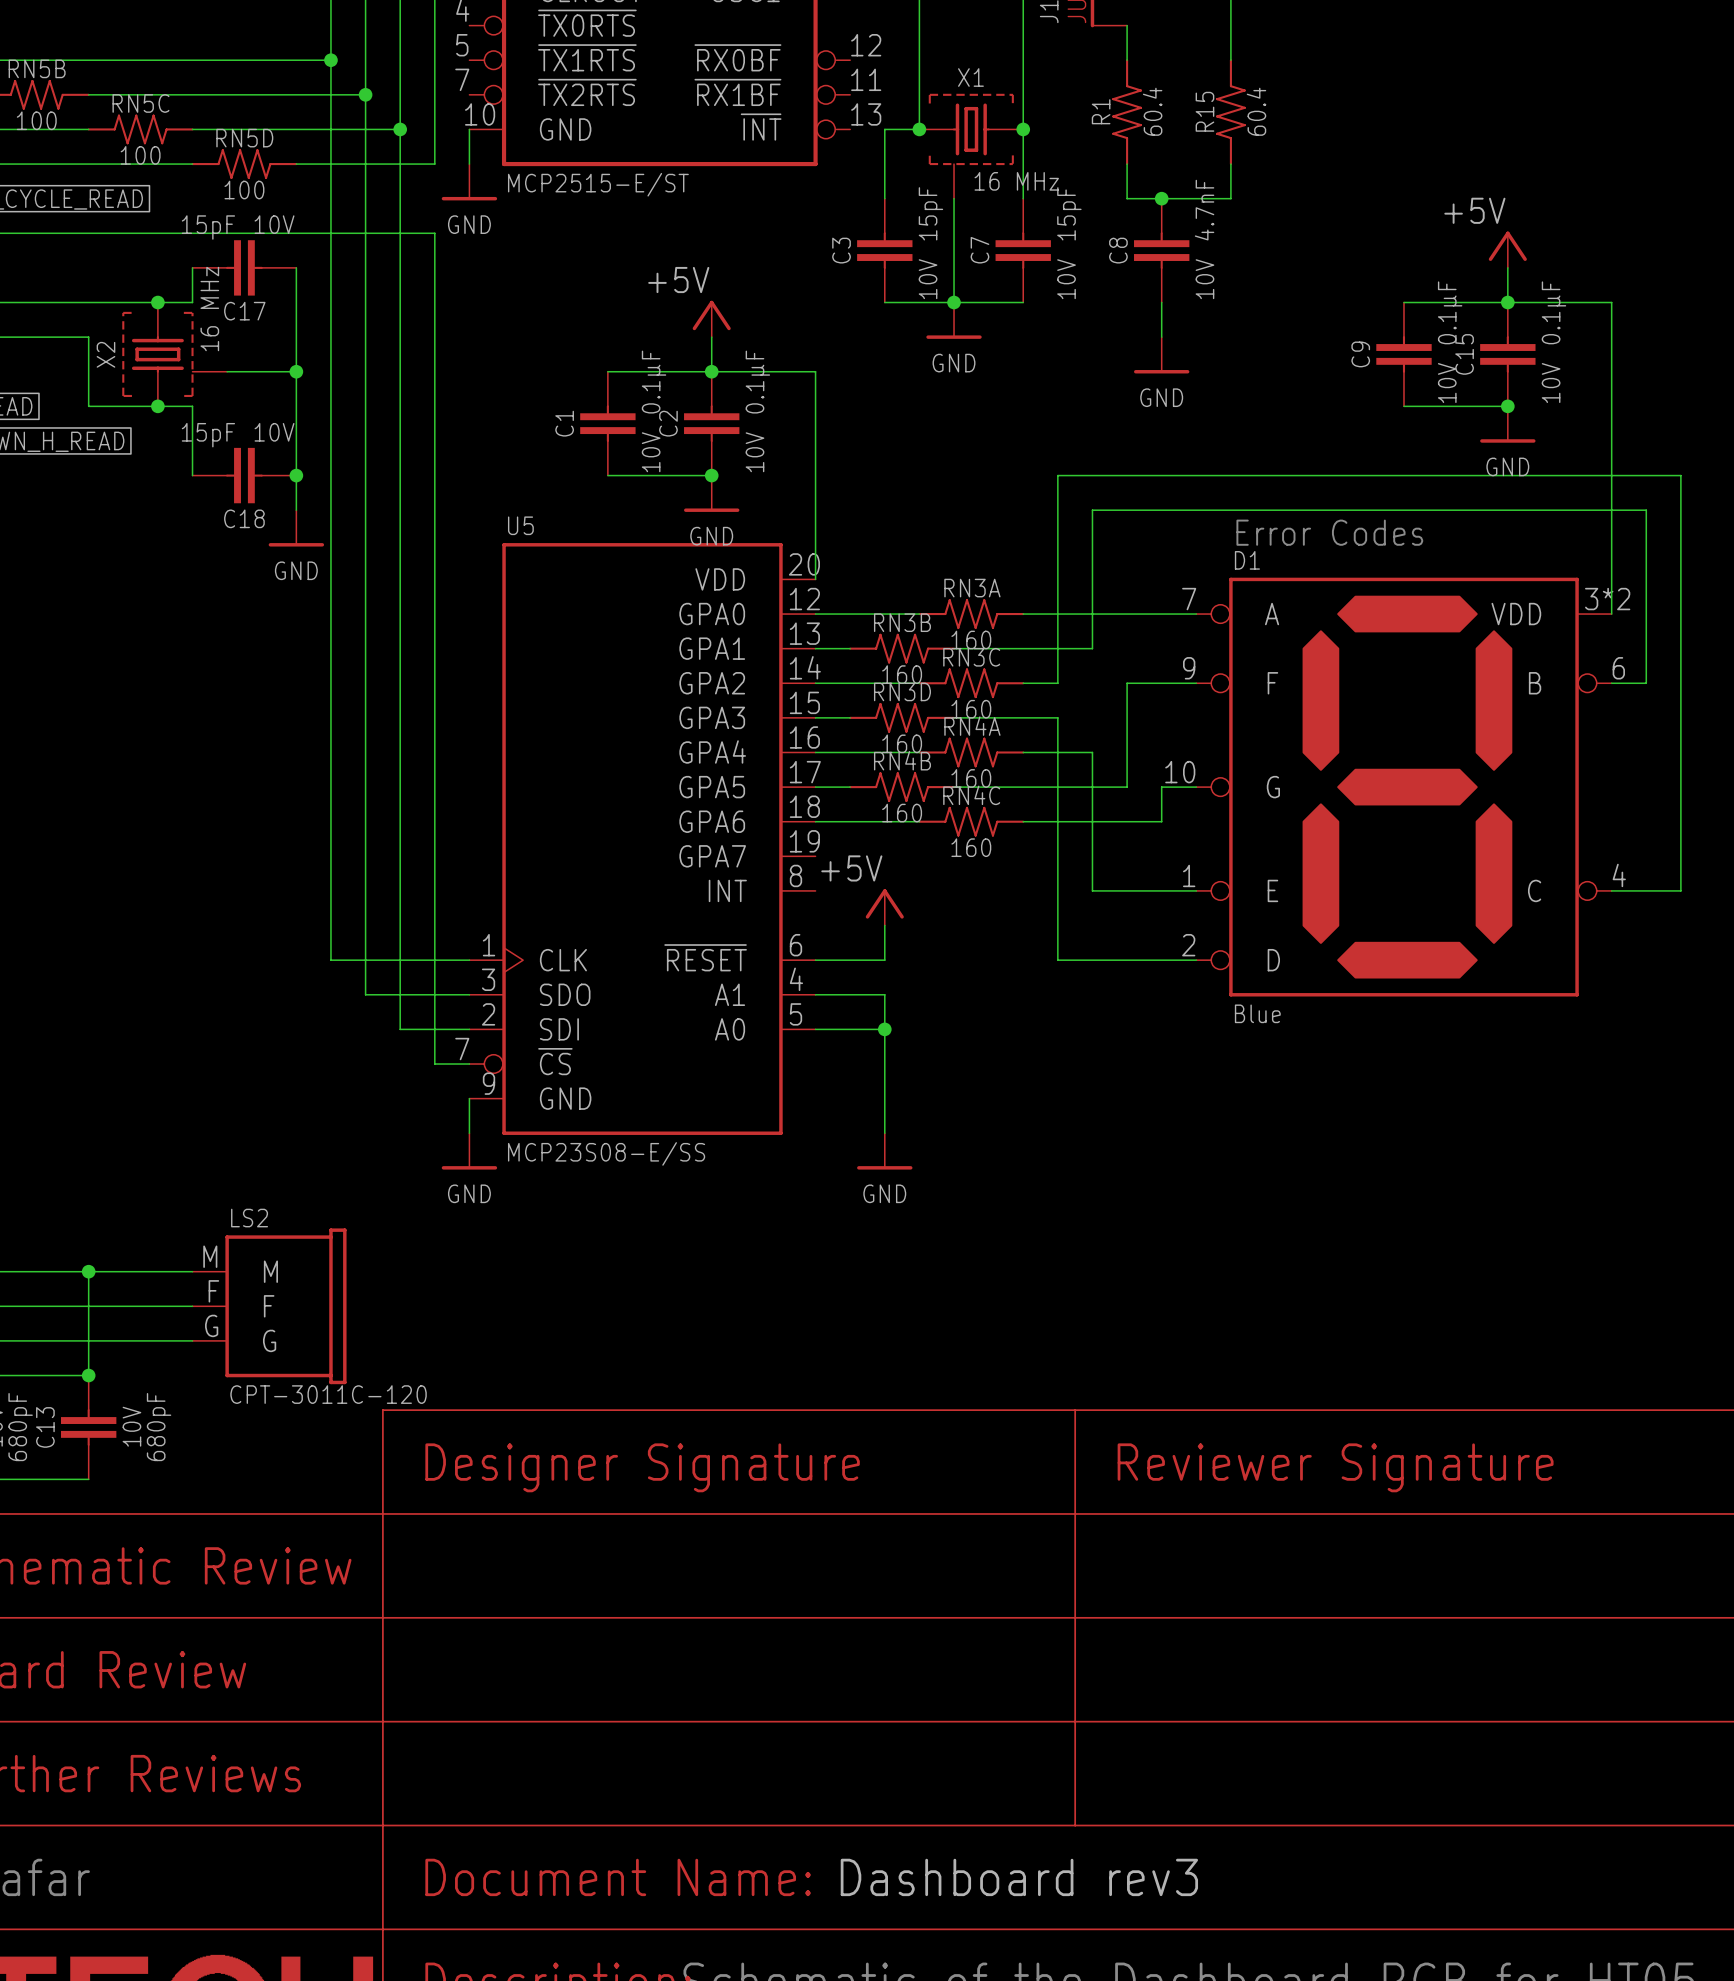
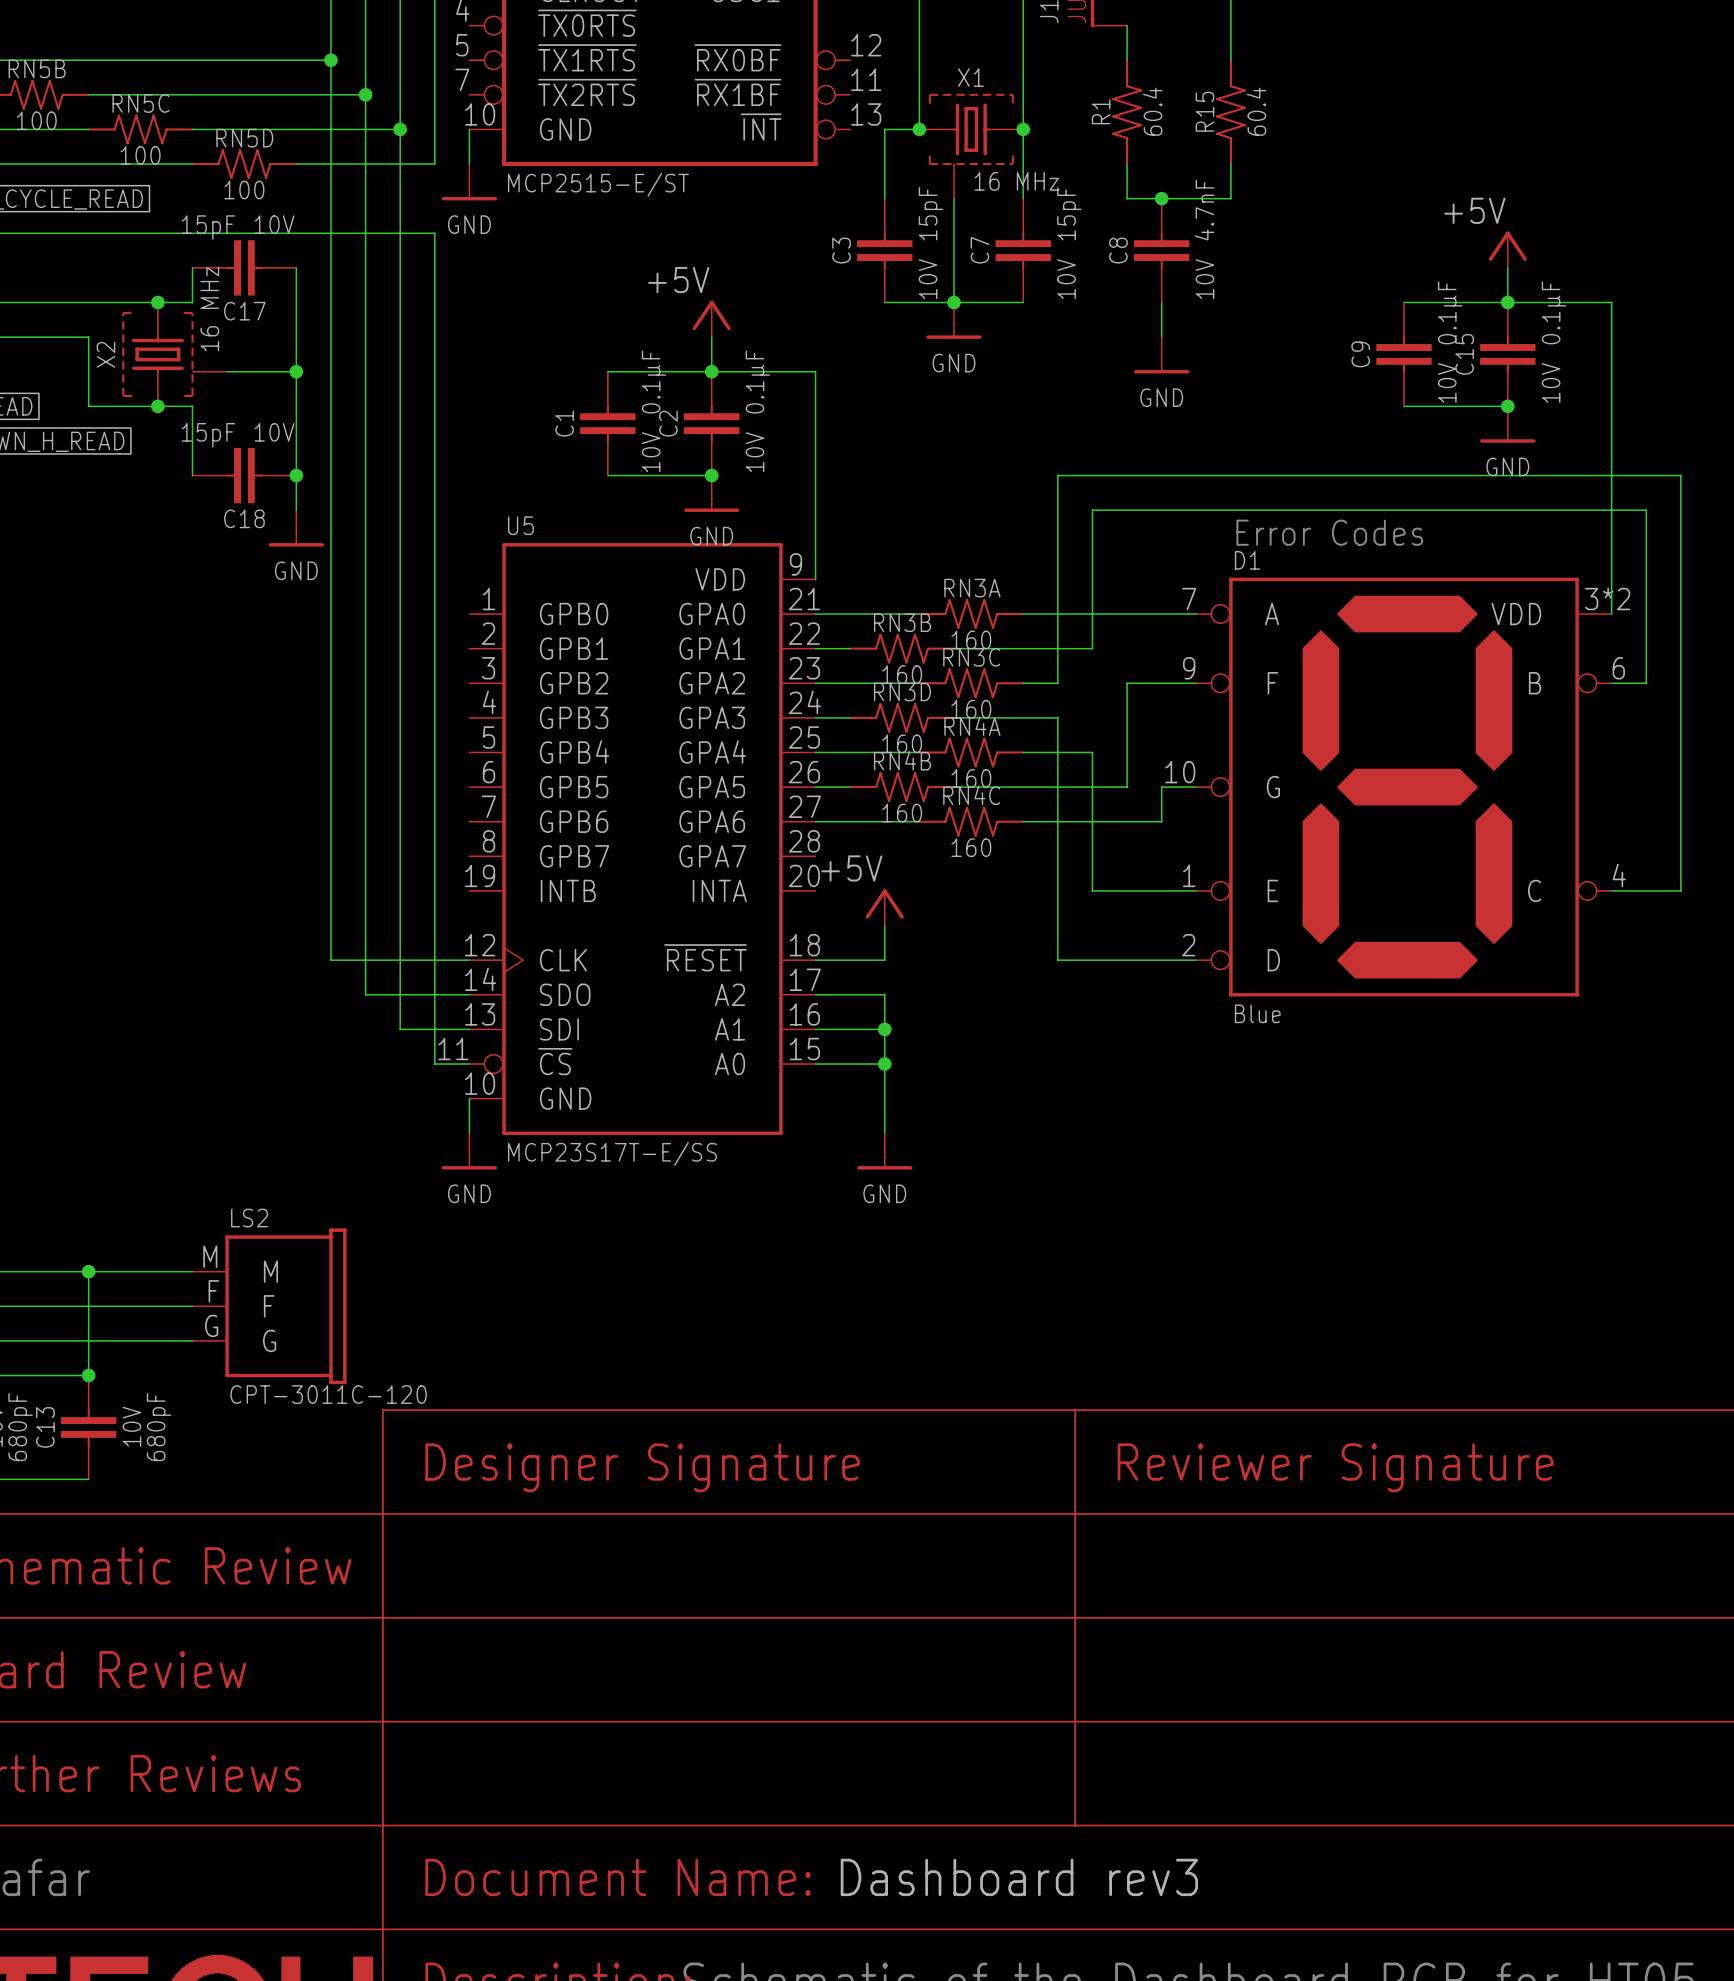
U5 symbol: [469, 543, 816, 1135] -> [469, 543, 816, 1135]
wire: none -> (815, 1064) (884, 1064)
junction: none -> (884, 1064)
U5 text: MCP23S08-E/SS (606, 1153) -> MCP23S17T-E/SS (612, 1153)

